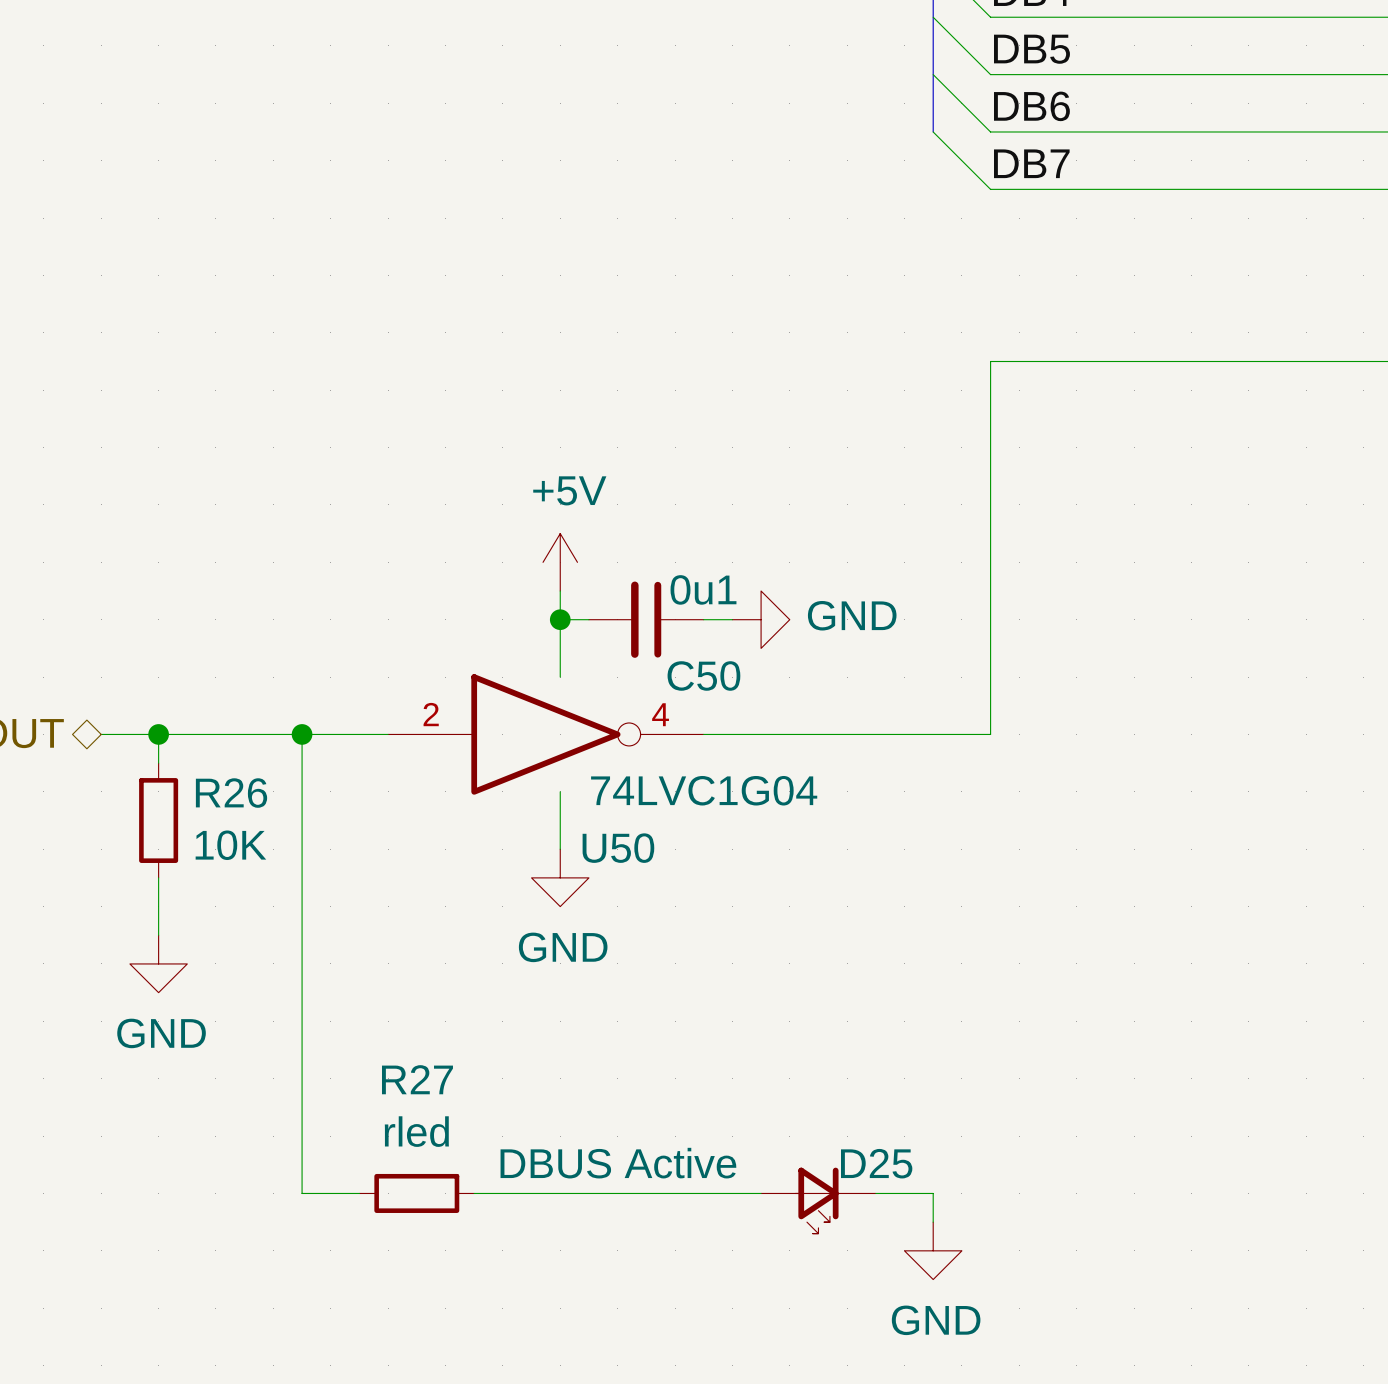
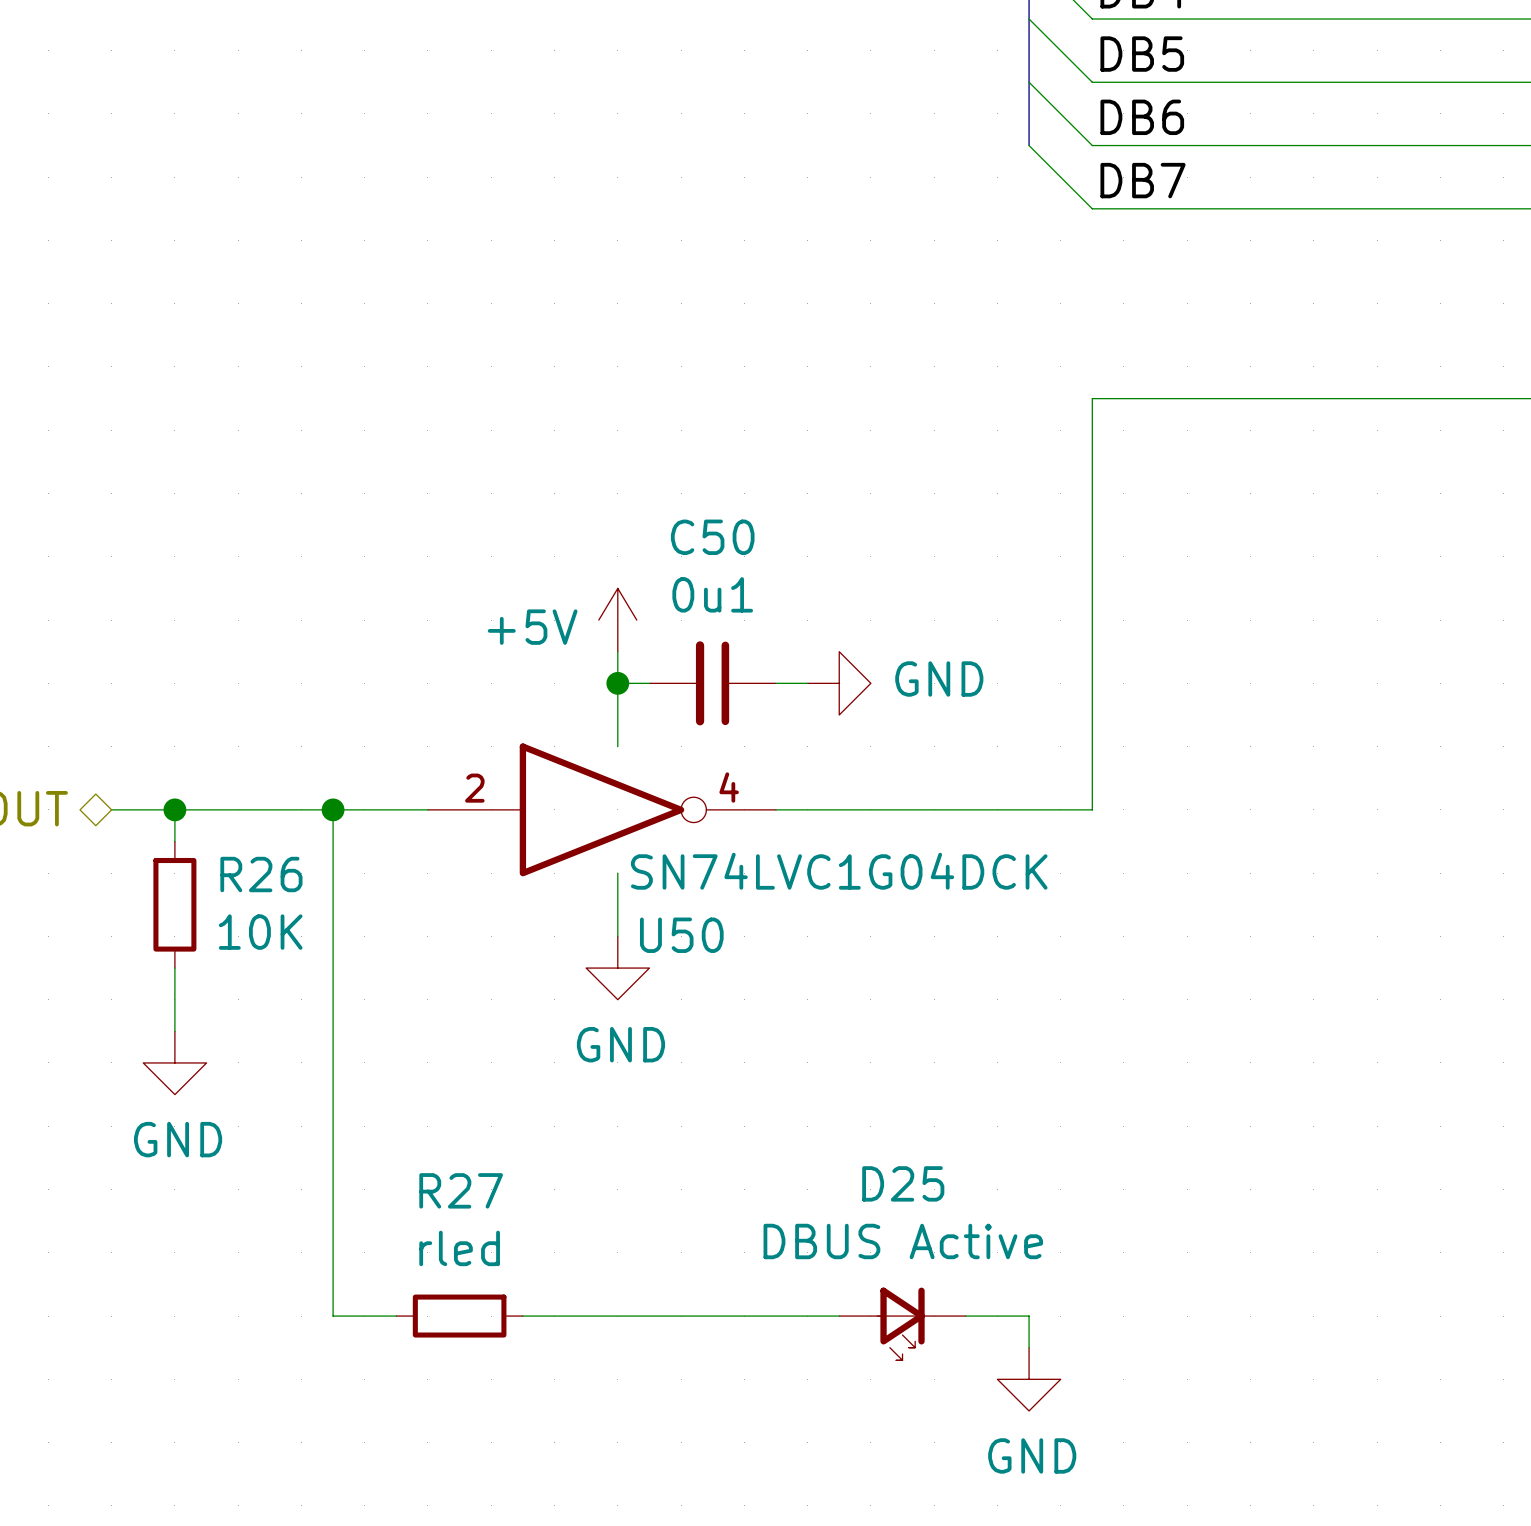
power symbol text position: +5V (569, 490) -> +5V (532, 627)
C50 value position: 0u1 (703, 589) -> 0u1 (712, 594)
C50 name position: C50 (703, 675) -> C50 (712, 537)
U50 value: 74LVC1G04 (704, 790) -> SN74LVC1G04DCK (839, 871)
D25 value position: DBUS Active (618, 1163) -> DBUS Active (903, 1241)
D25 name position: D25 (876, 1163) -> D25 (903, 1183)

